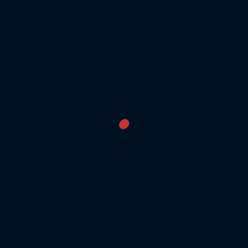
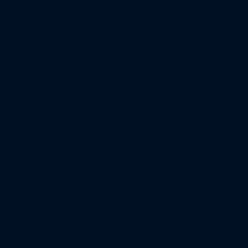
track: (124, 123) (123, 124) -> none

